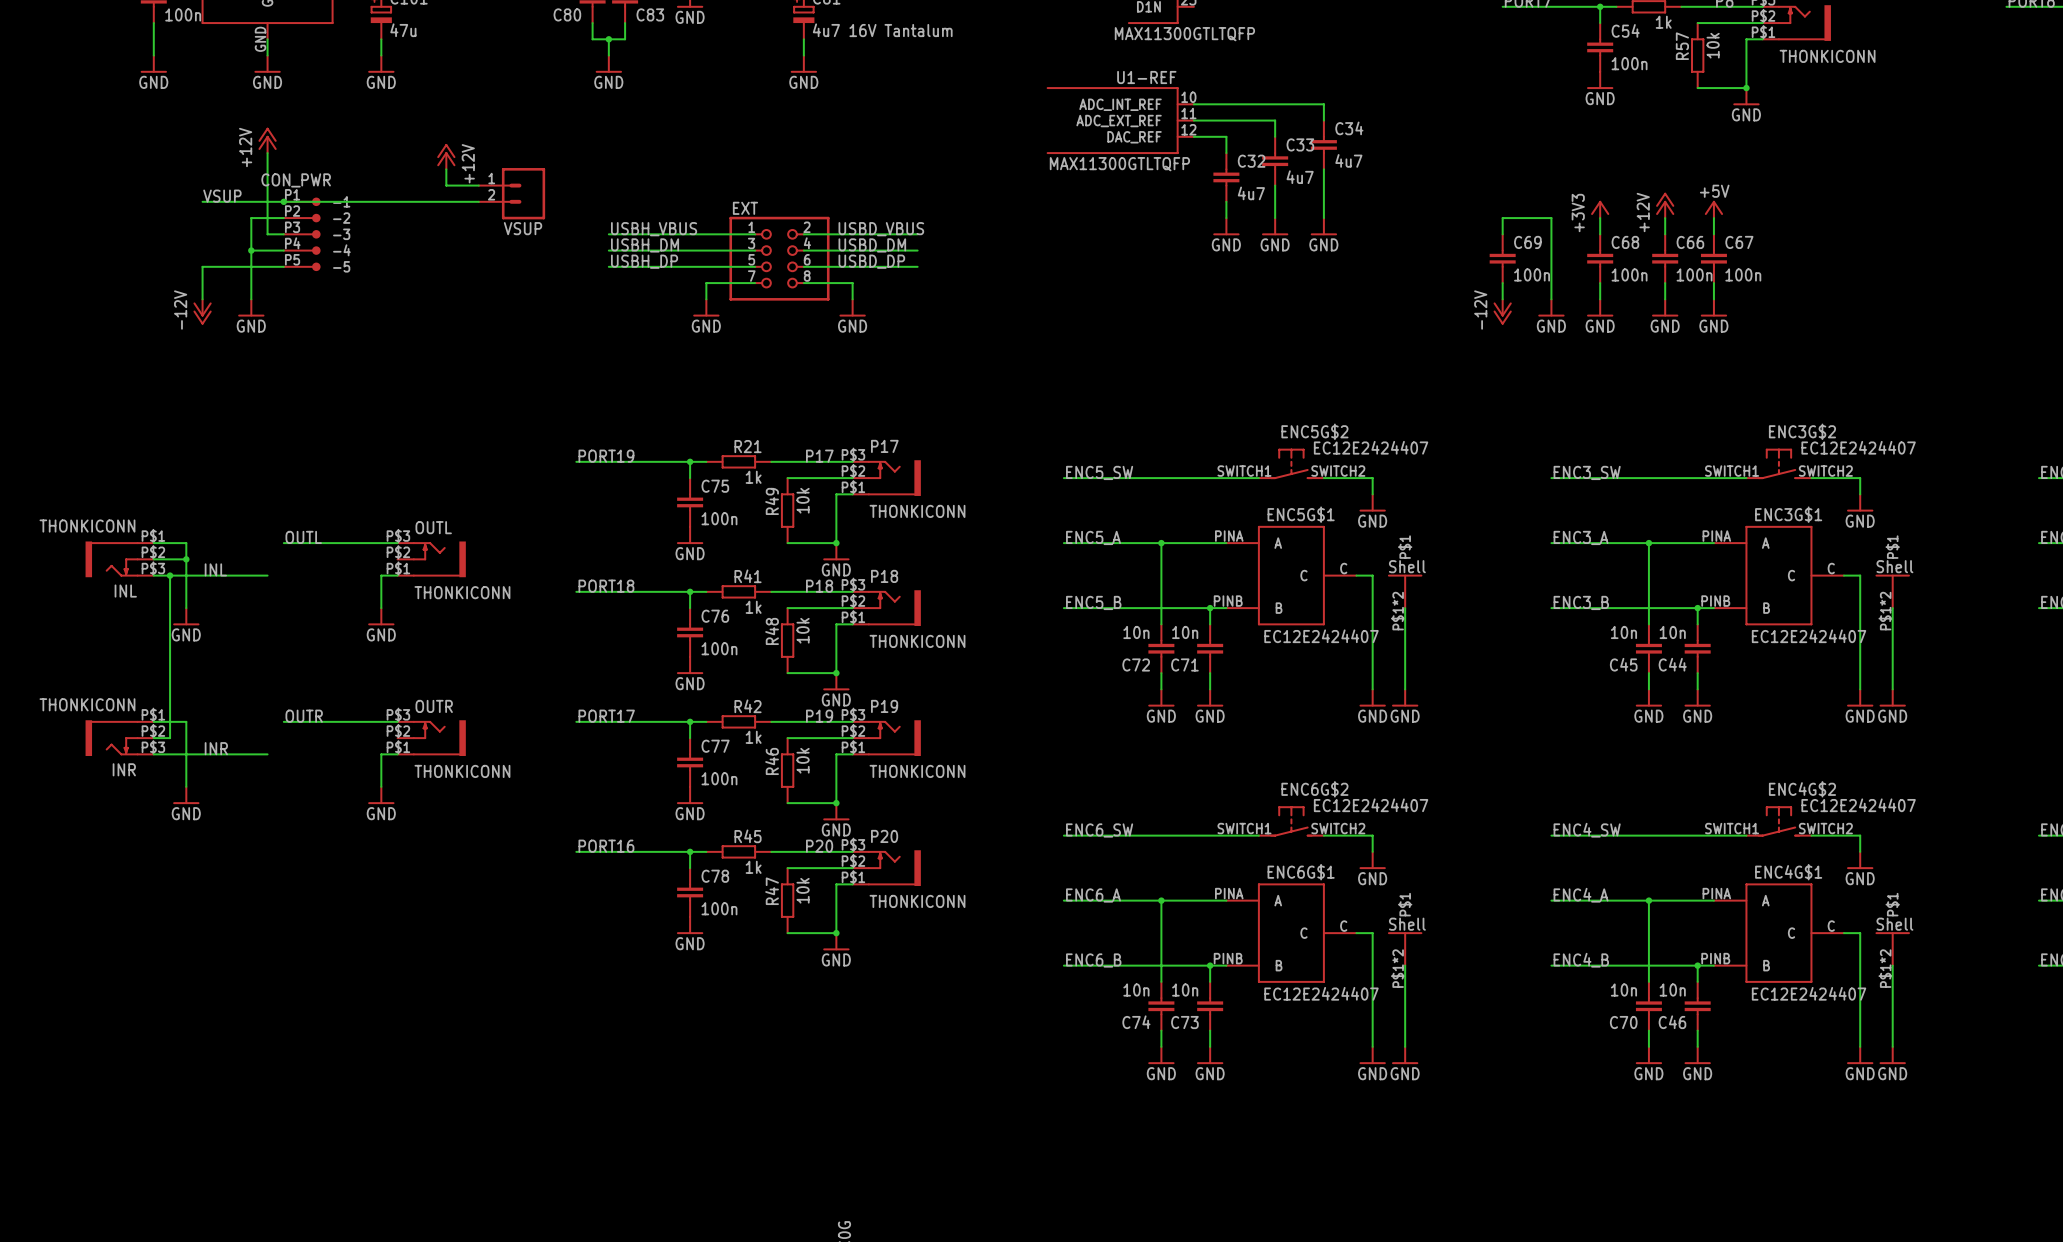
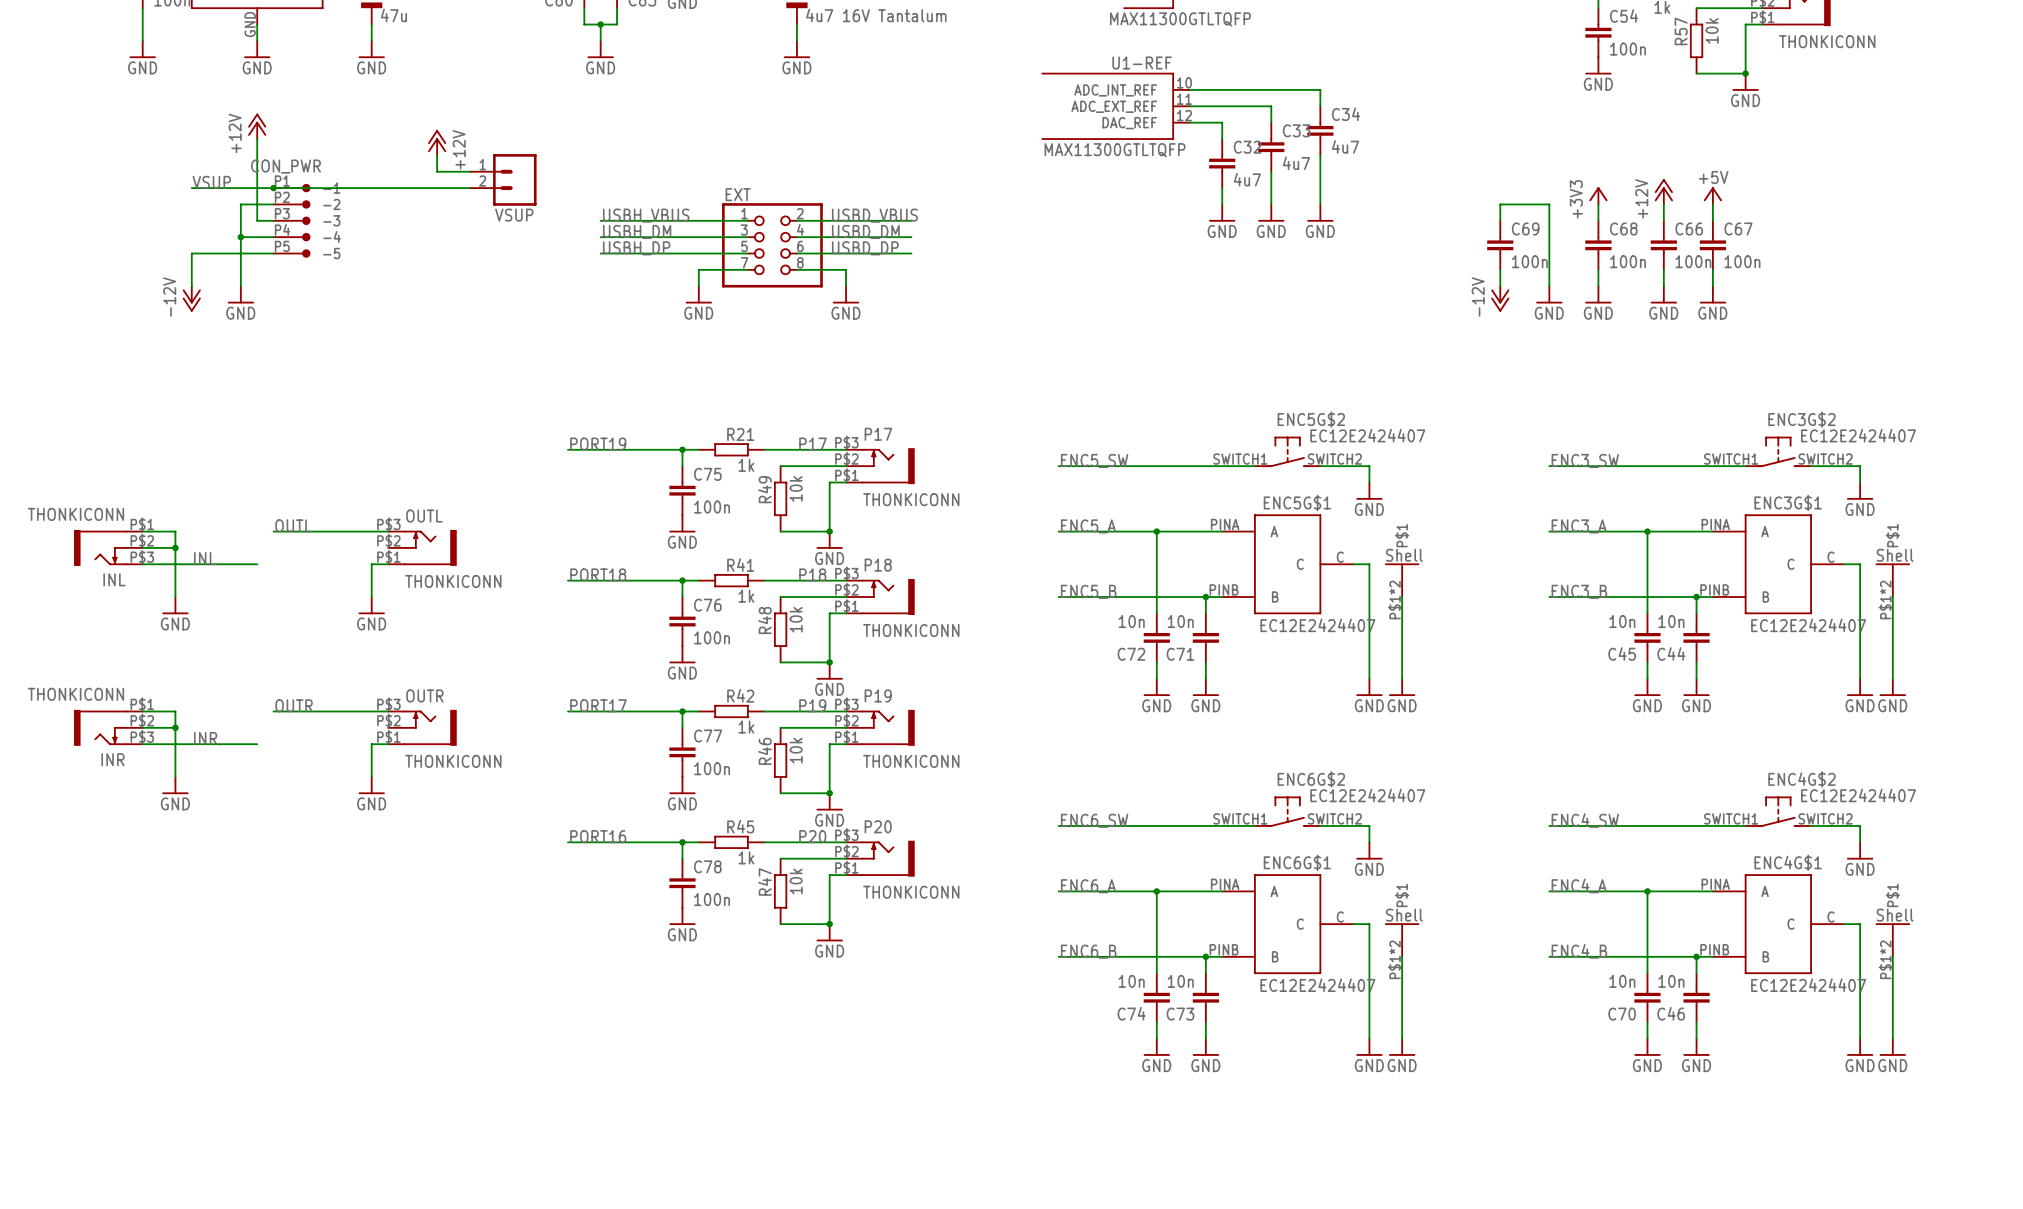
wire: (170, 575) (170, 738) -> (175, 727) (159, 727)
junction: (170, 575) -> none
junction: none -> (175, 727)

